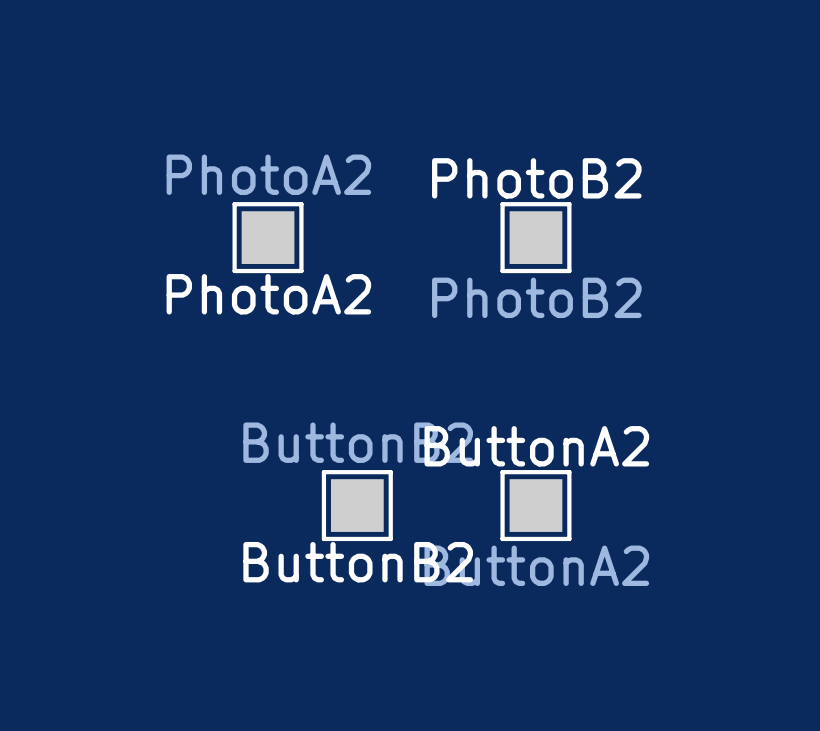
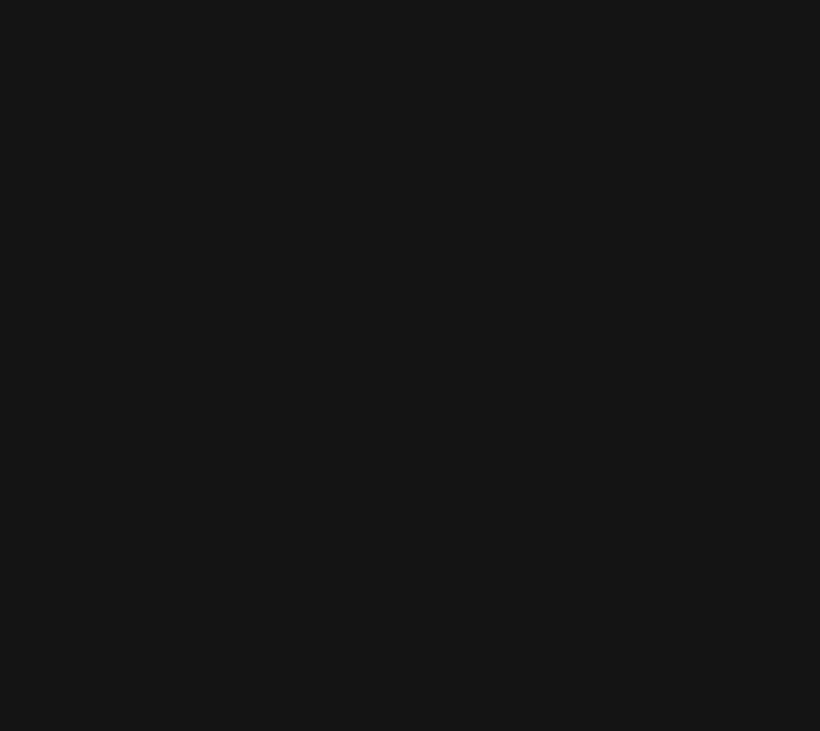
PhotoA2: PhotoA2 (268, 237) -> none
PhotoB2: PhotoB2 (535, 237) -> none
ButtonB2: ButtonB2 (357, 505) -> none
ButtonA2: ButtonA2 (535, 505) -> none

